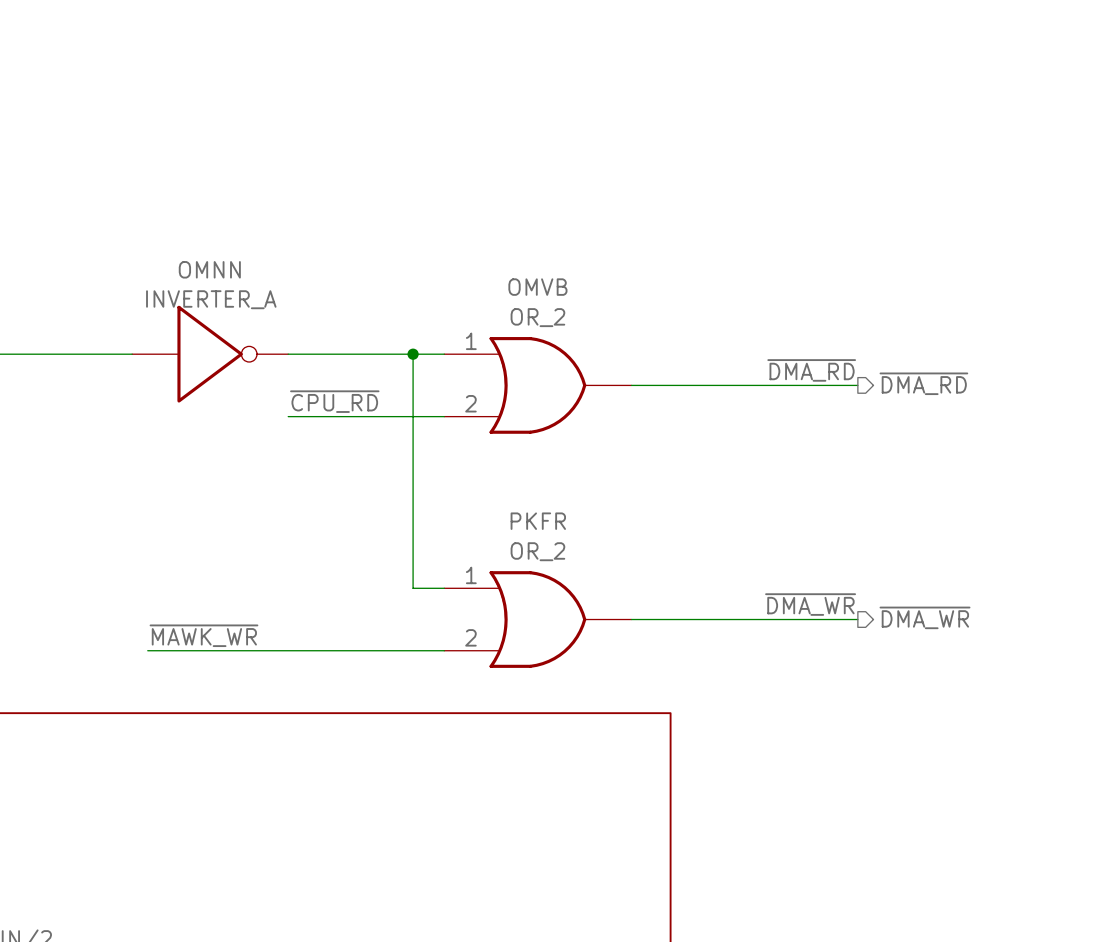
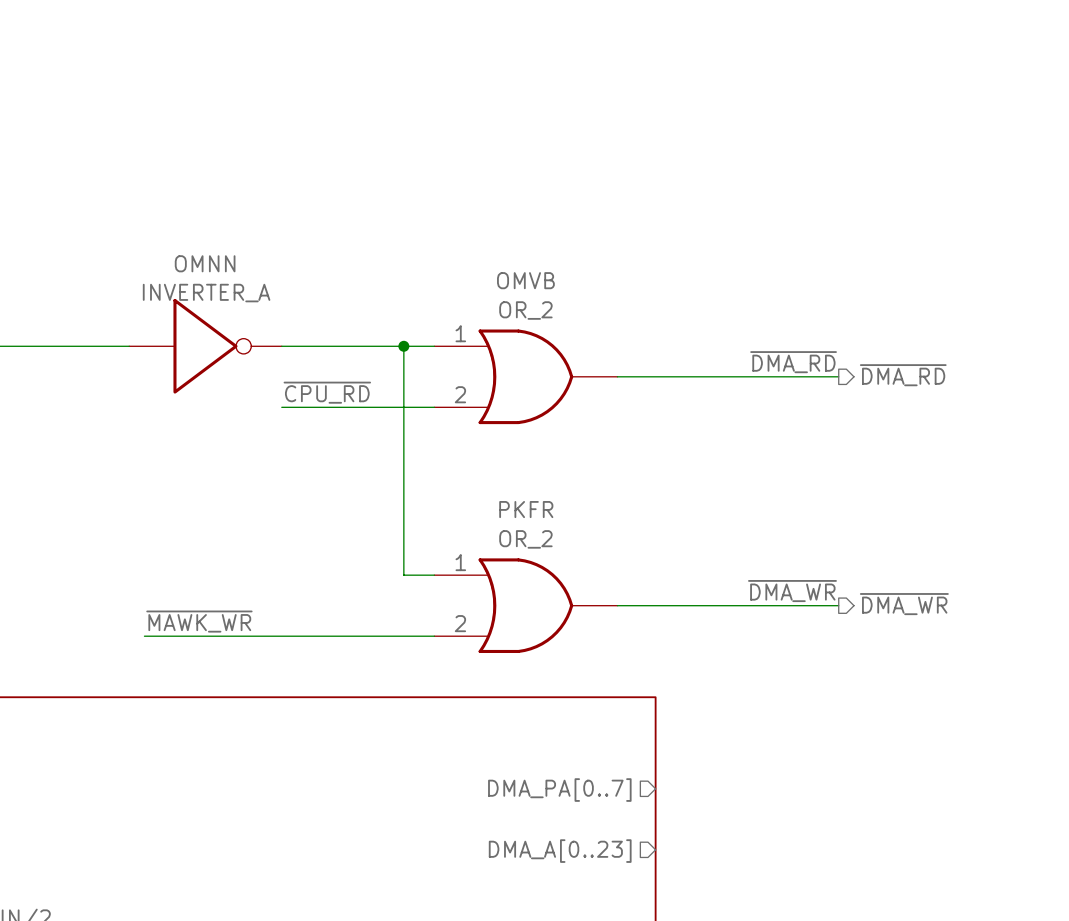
sheet pin: none -> DMA_PA[0..7] (559, 790)
sheet pin: none -> DMA_A[0..23] (560, 851)

